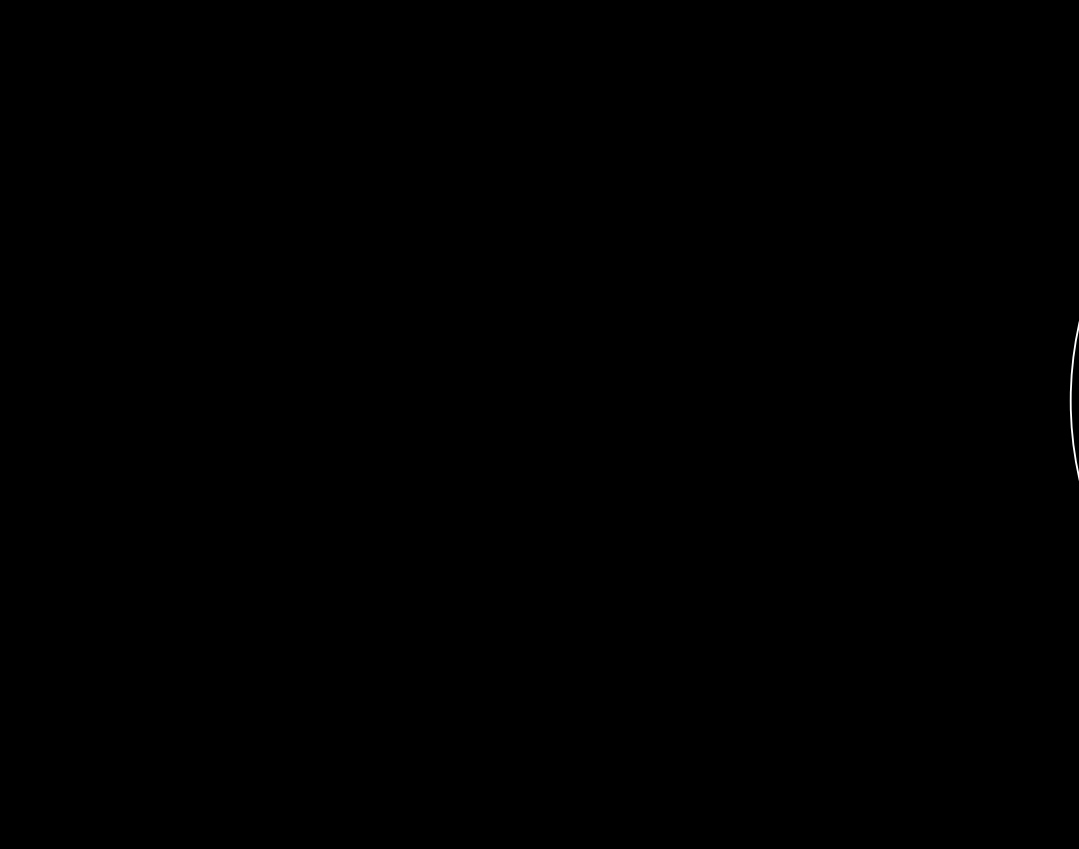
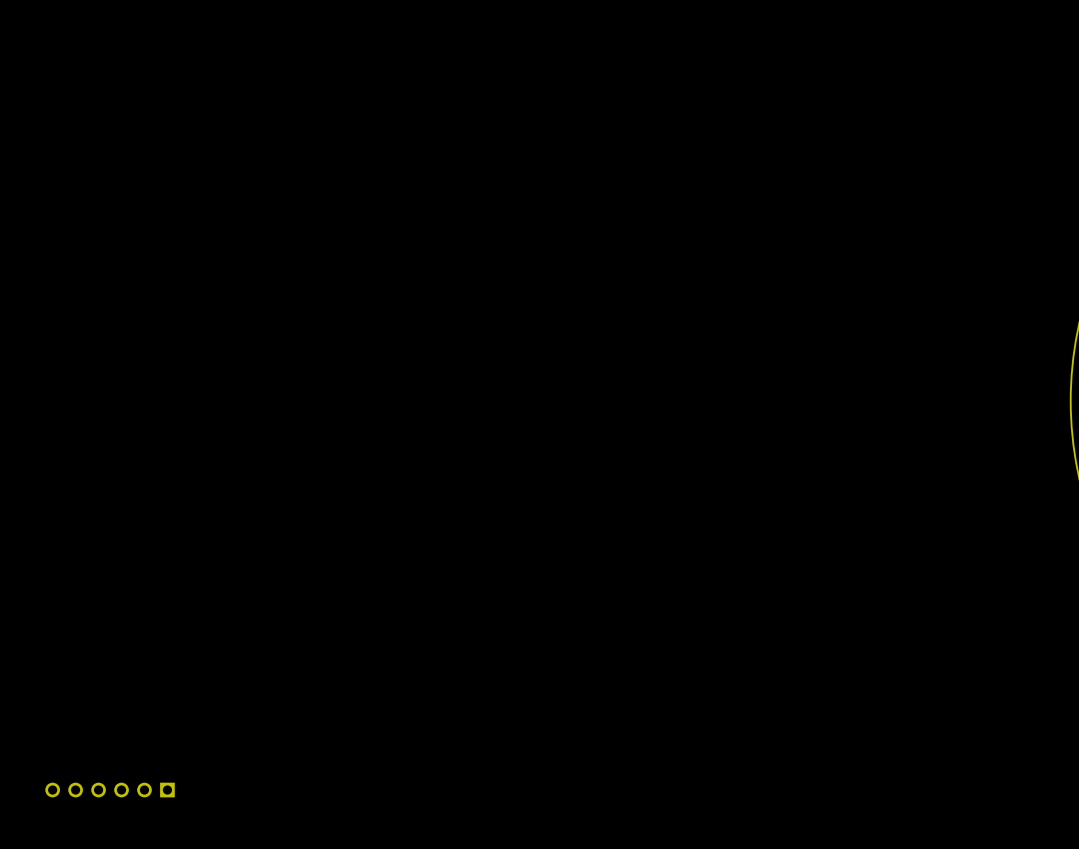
part: none -> (110, 790)

